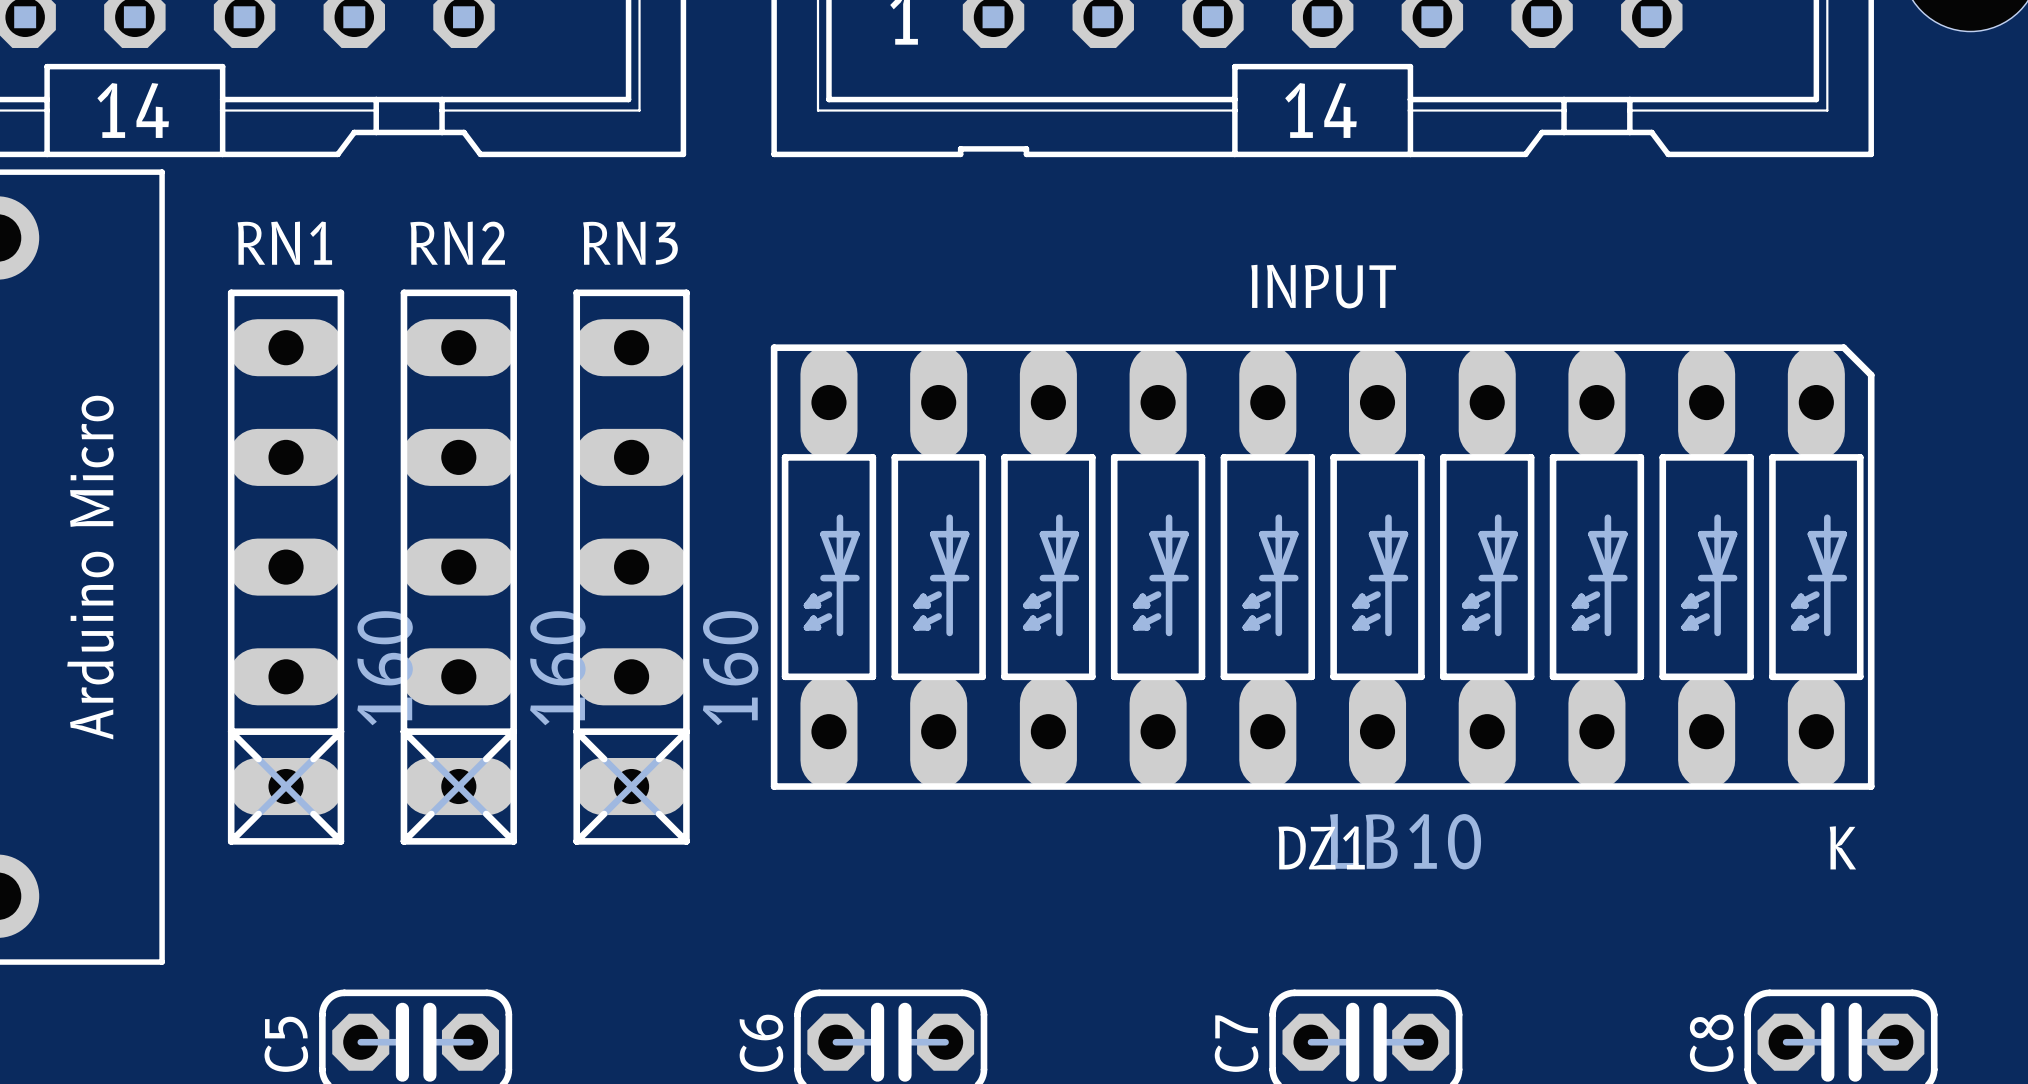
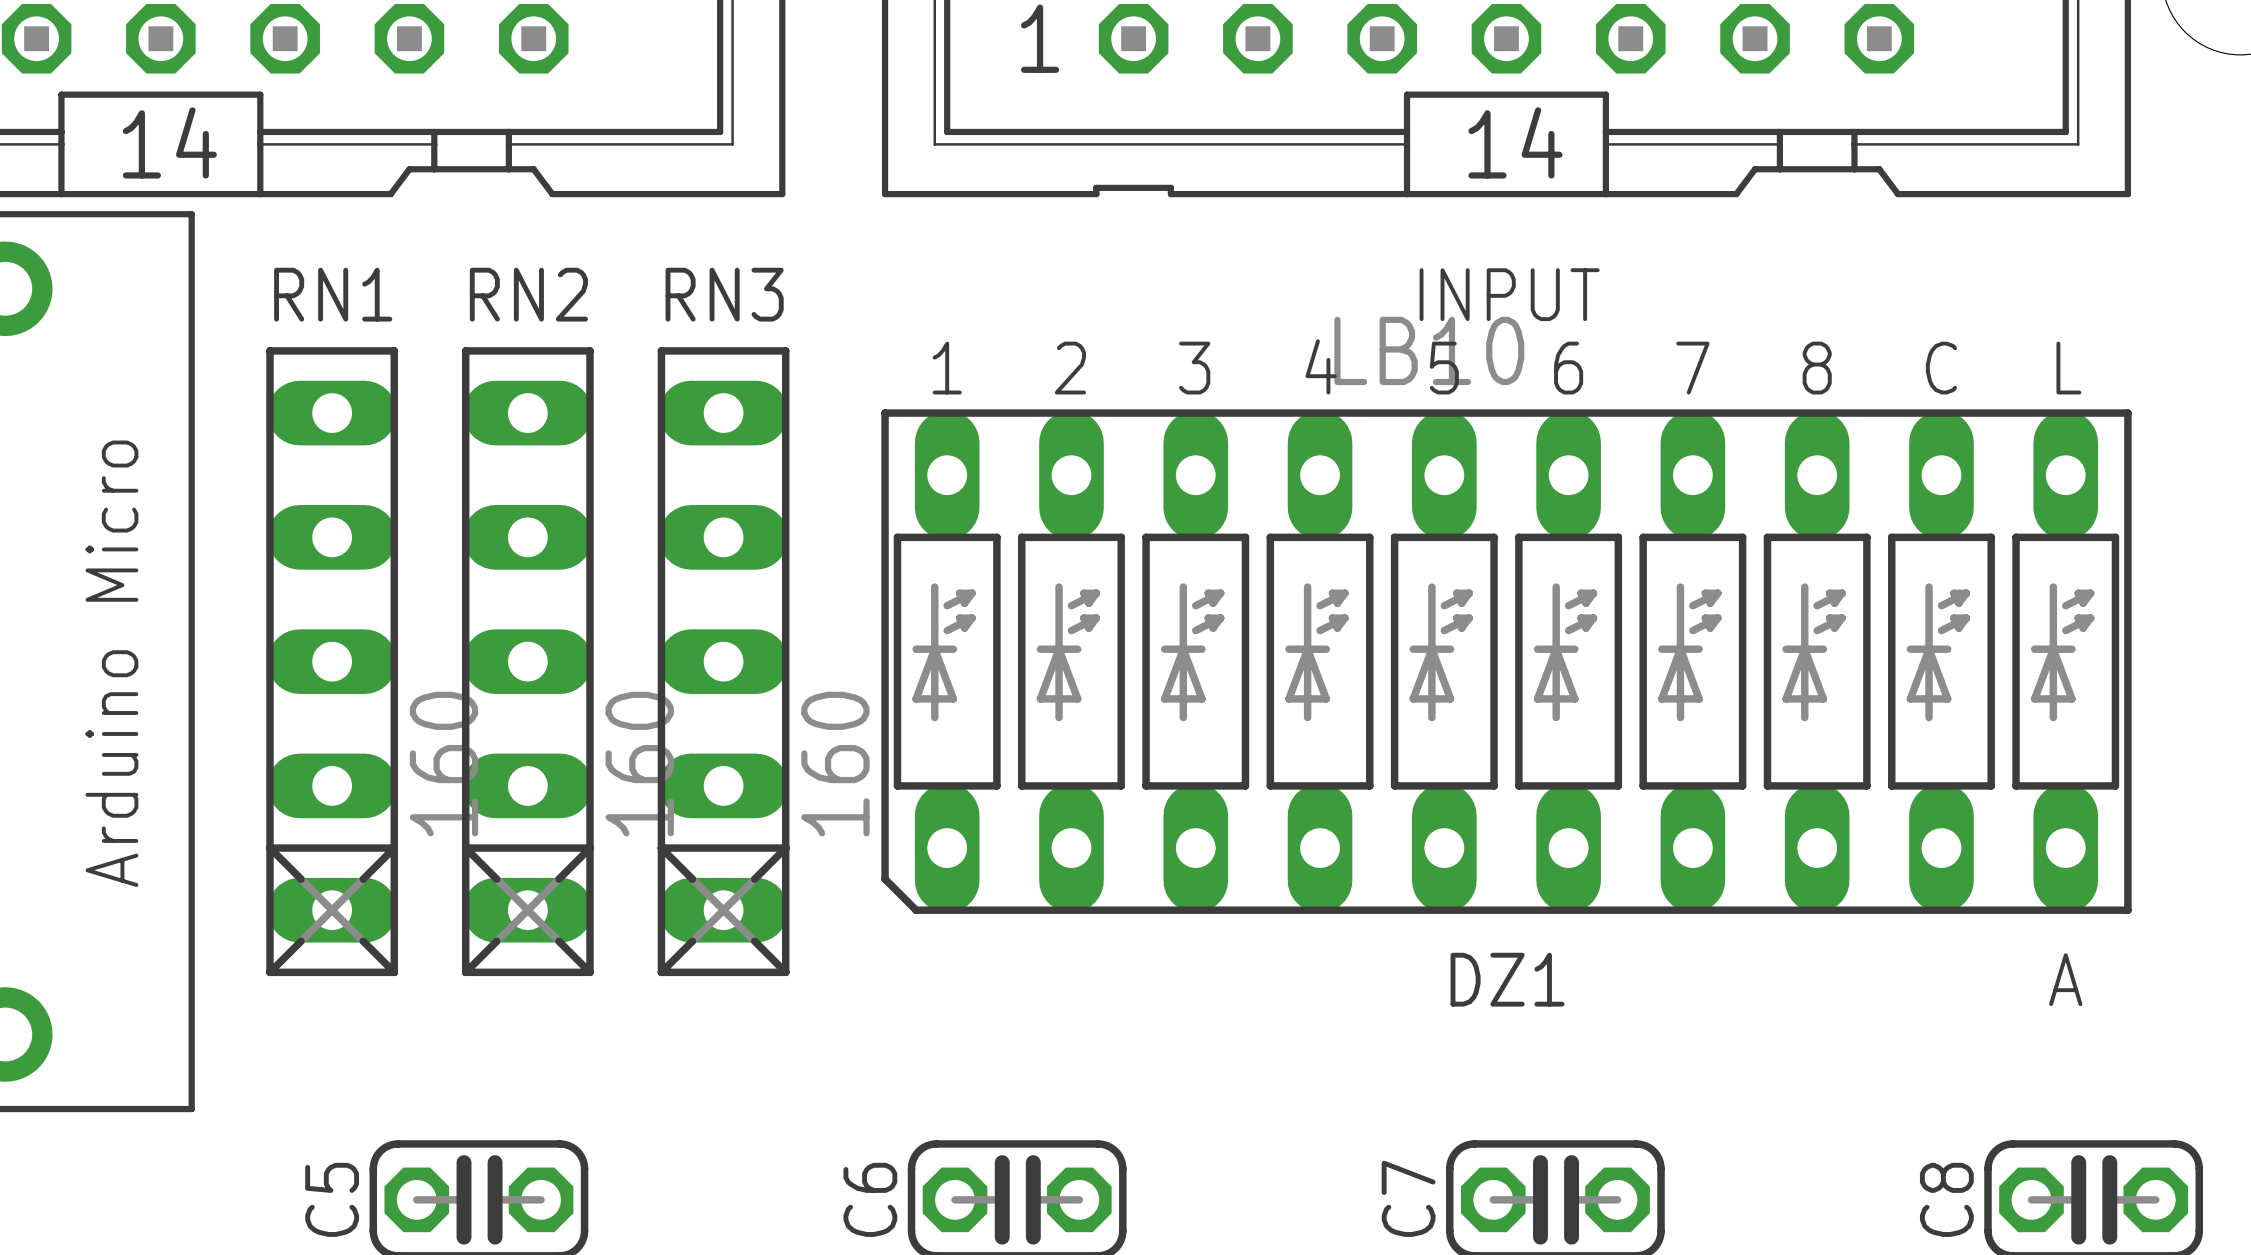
text position: INPUT (1323, 286) -> INPUT (1509, 294)
text: none -> 1 (947, 368)
text: none -> 2 (1070, 368)
text: none -> 4 (1321, 366)
text: none -> L (2068, 368)
text: none -> 3 (1194, 368)
text: none -> 5 (1444, 368)
text: none -> 6 (1568, 368)
text: none -> 7 (1692, 368)
text: none -> 8 (1817, 368)
text: none -> C (1941, 368)
DZ1 rotation: 0° (1322, 567) -> 180° (1506, 661)
text: K (1842, 847) -> A (2065, 979)

